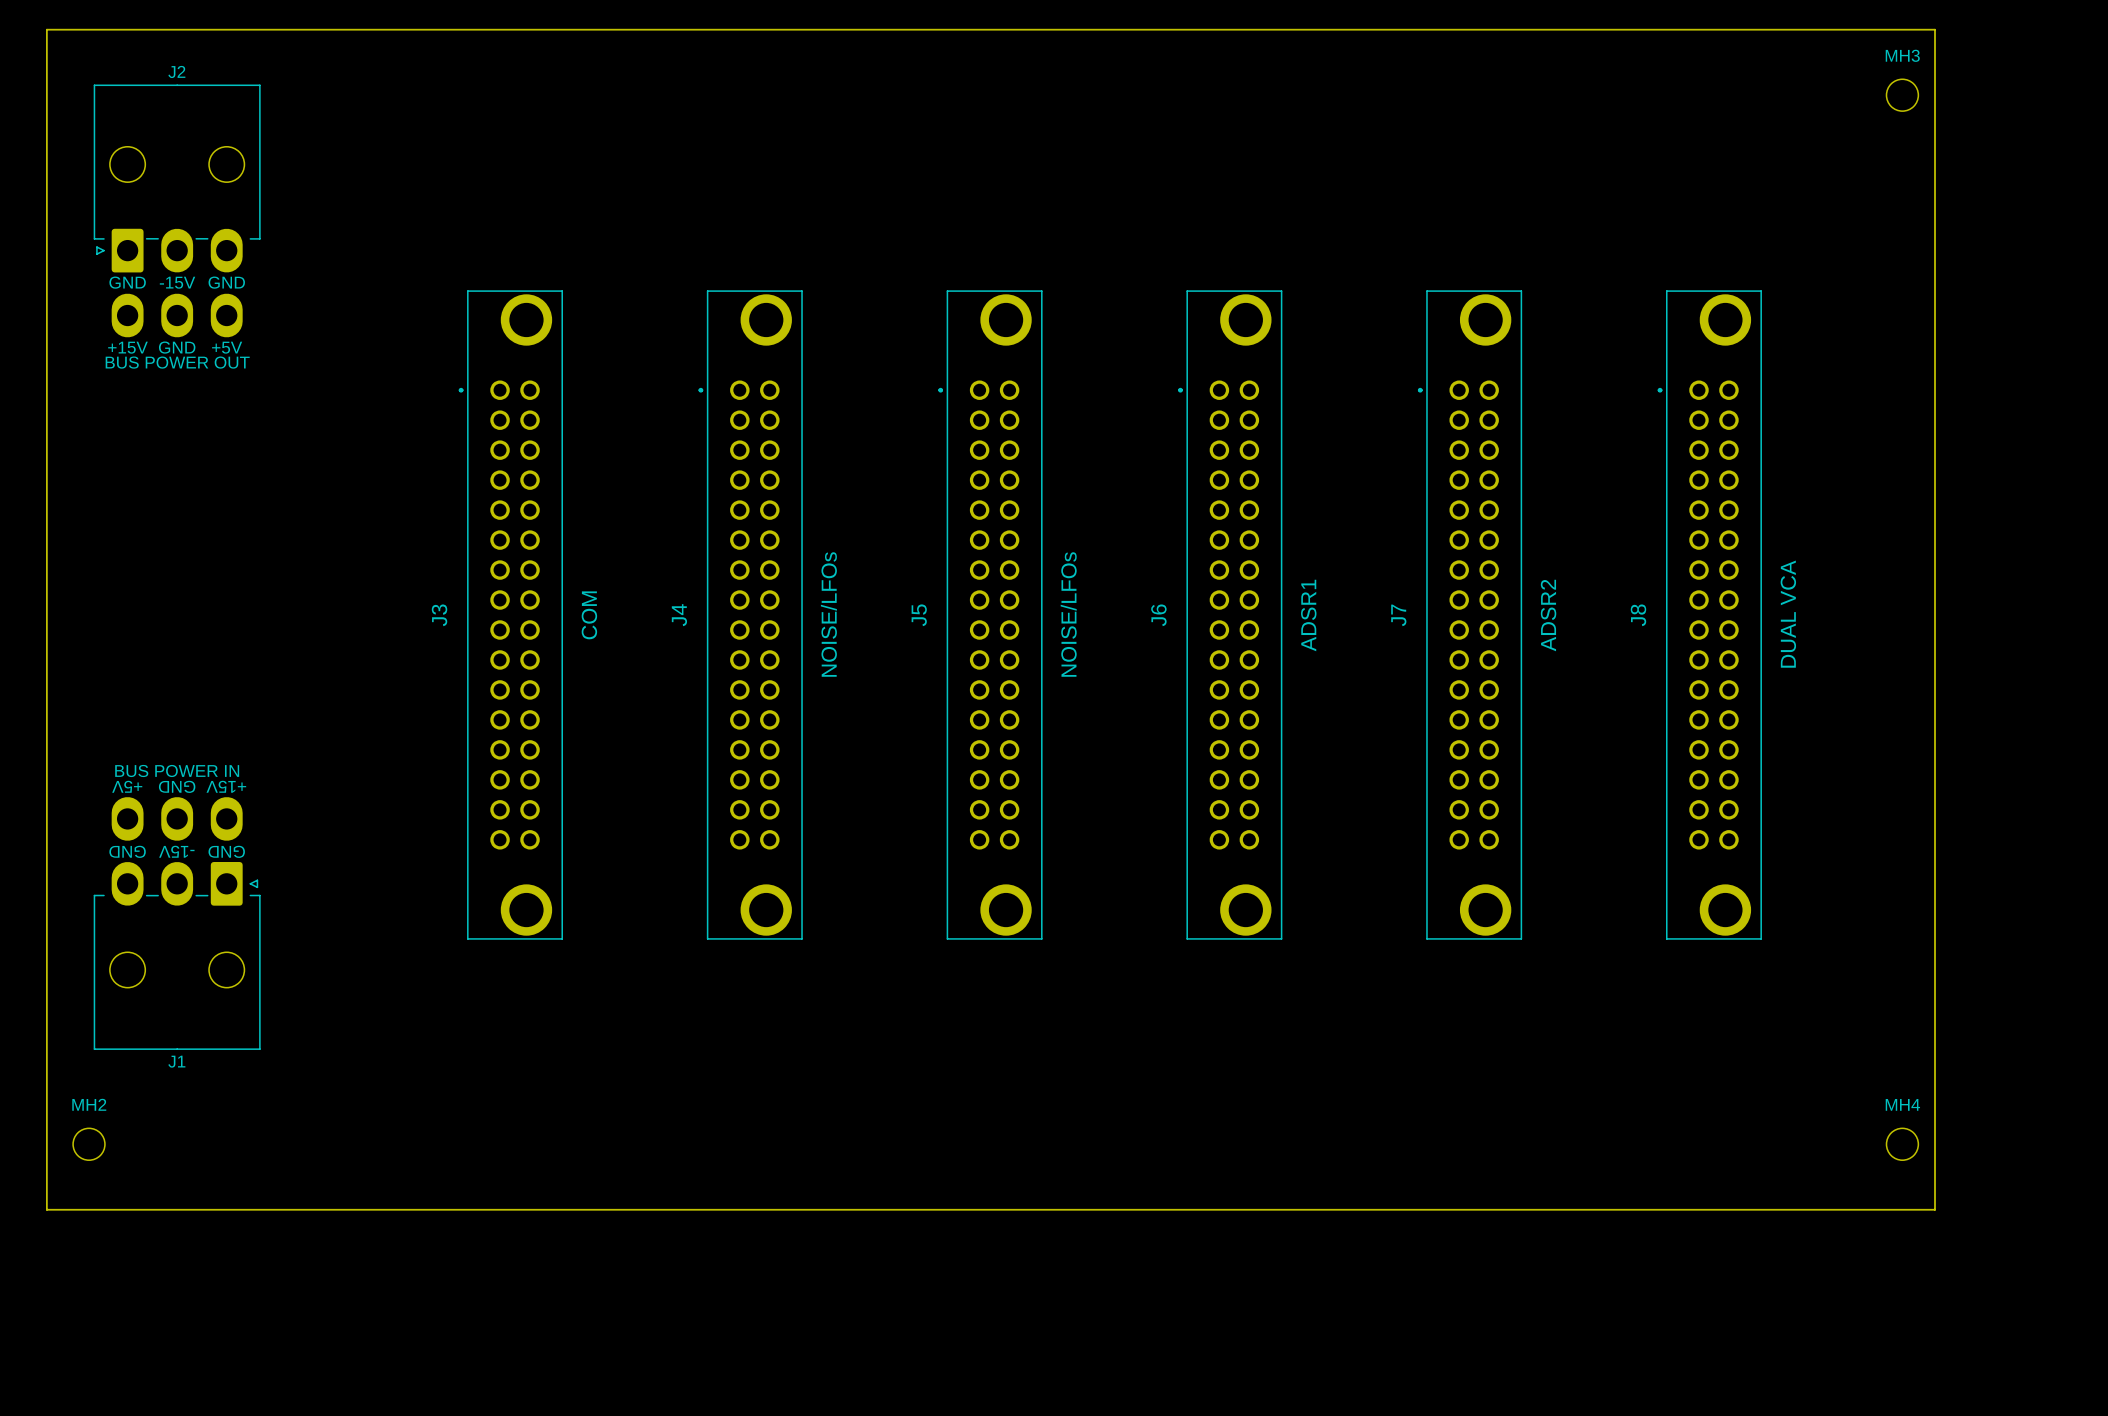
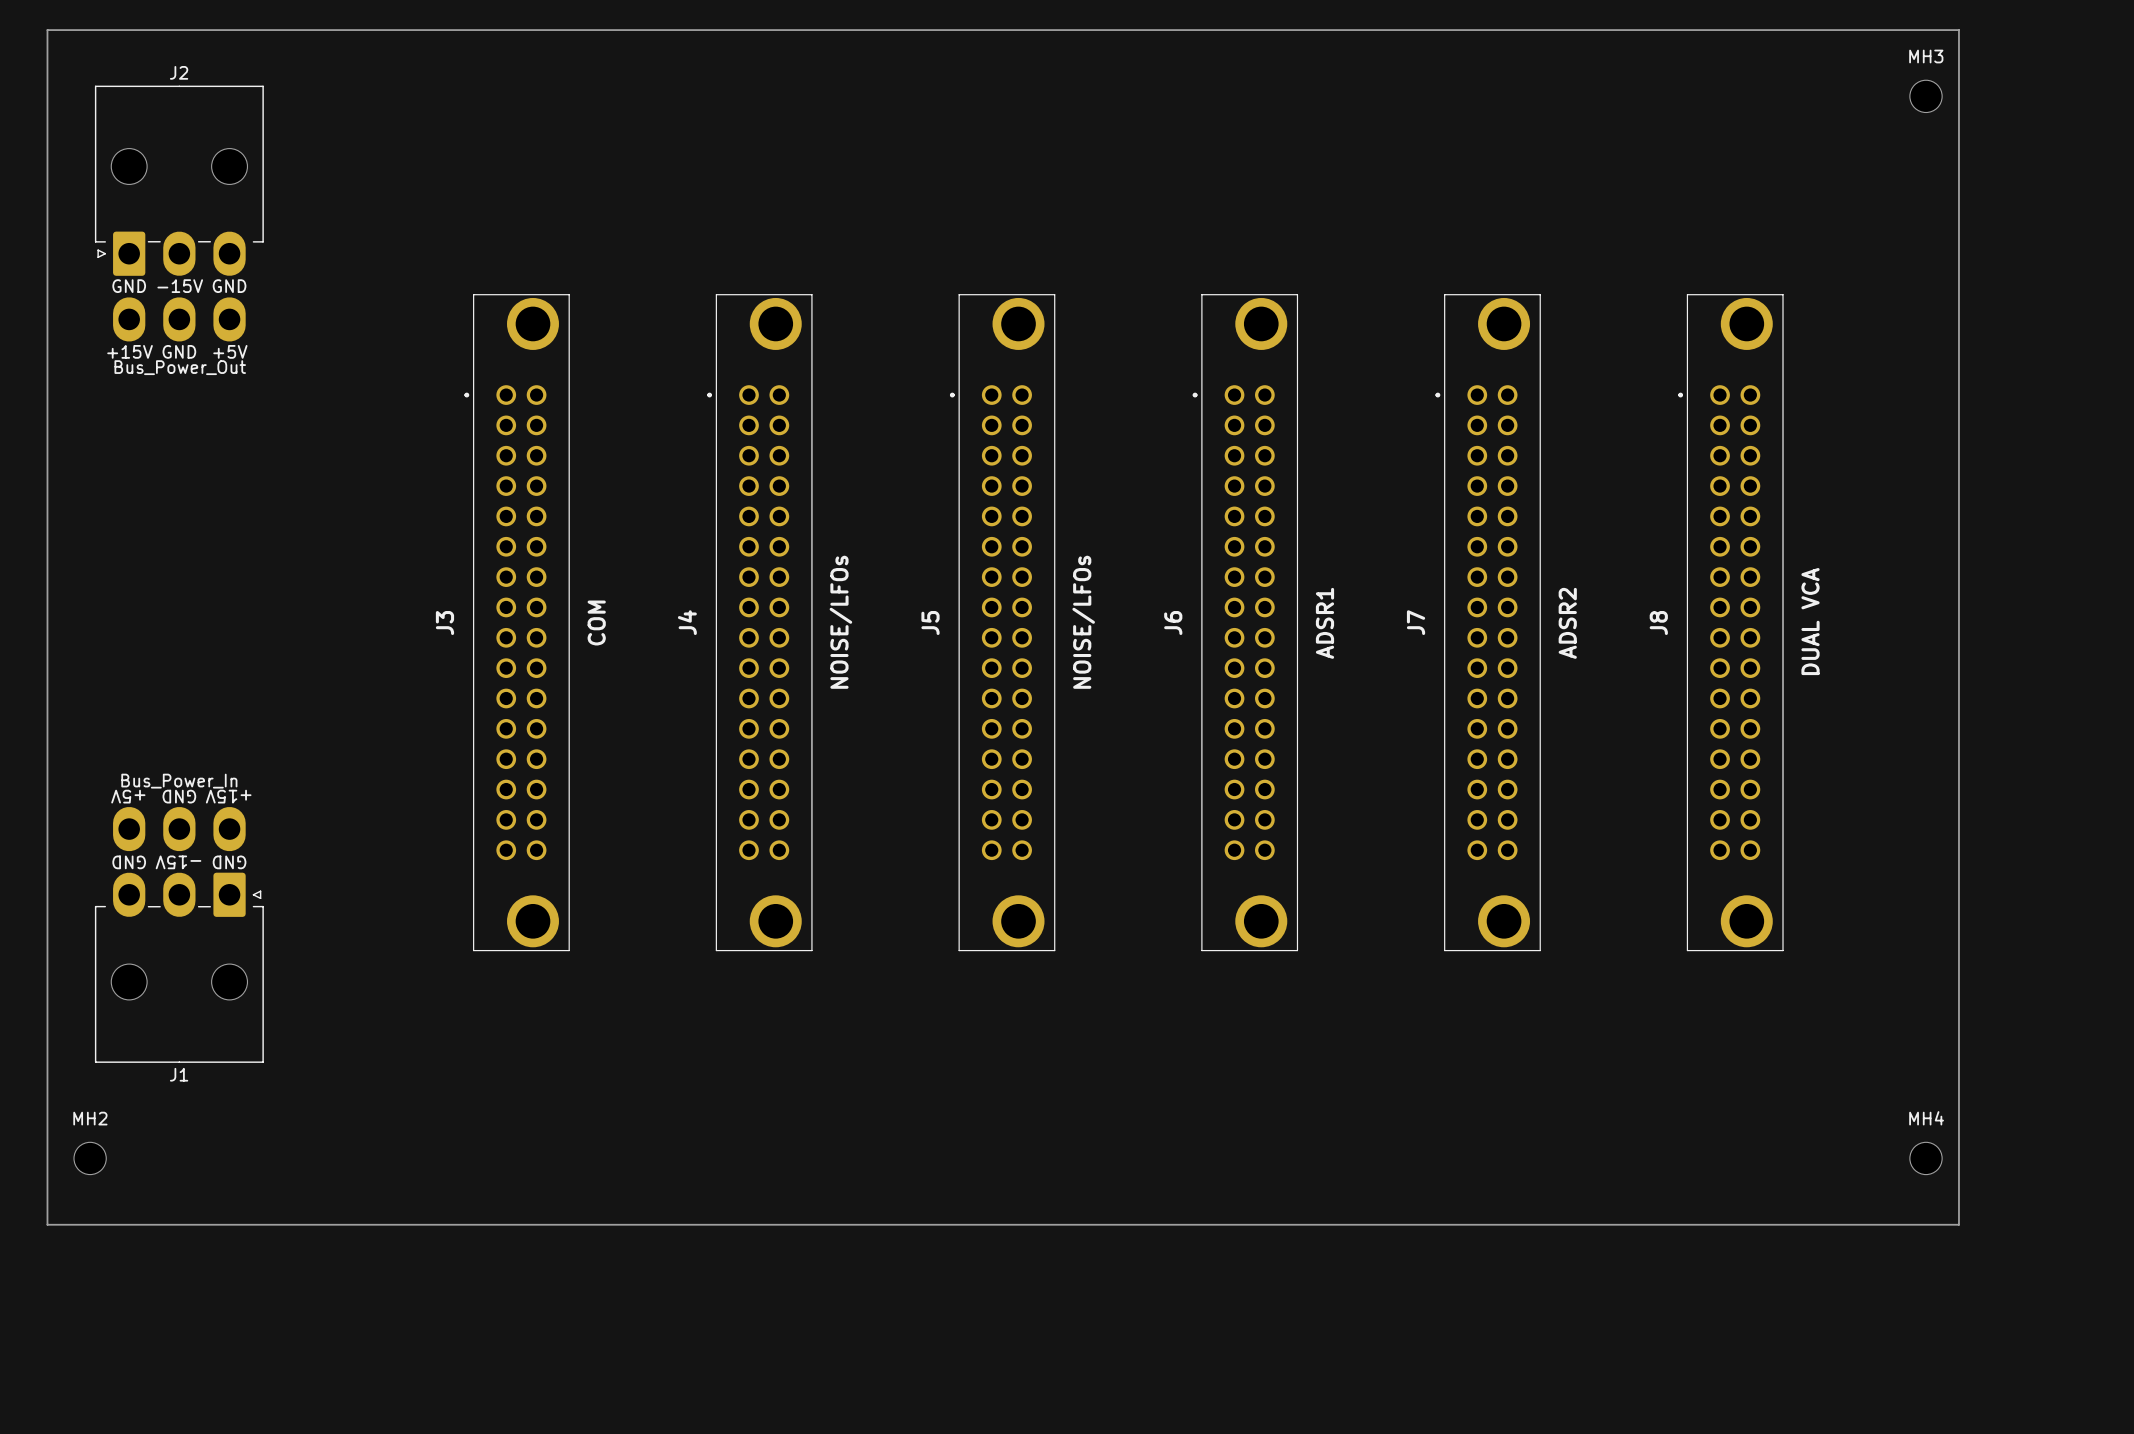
J2 value: BUS POWER OUT (177, 362) -> Bus_Power_Out (180, 367)
J1 value: BUS POWER IN (177, 770) -> Bus_Power_In (179, 781)

